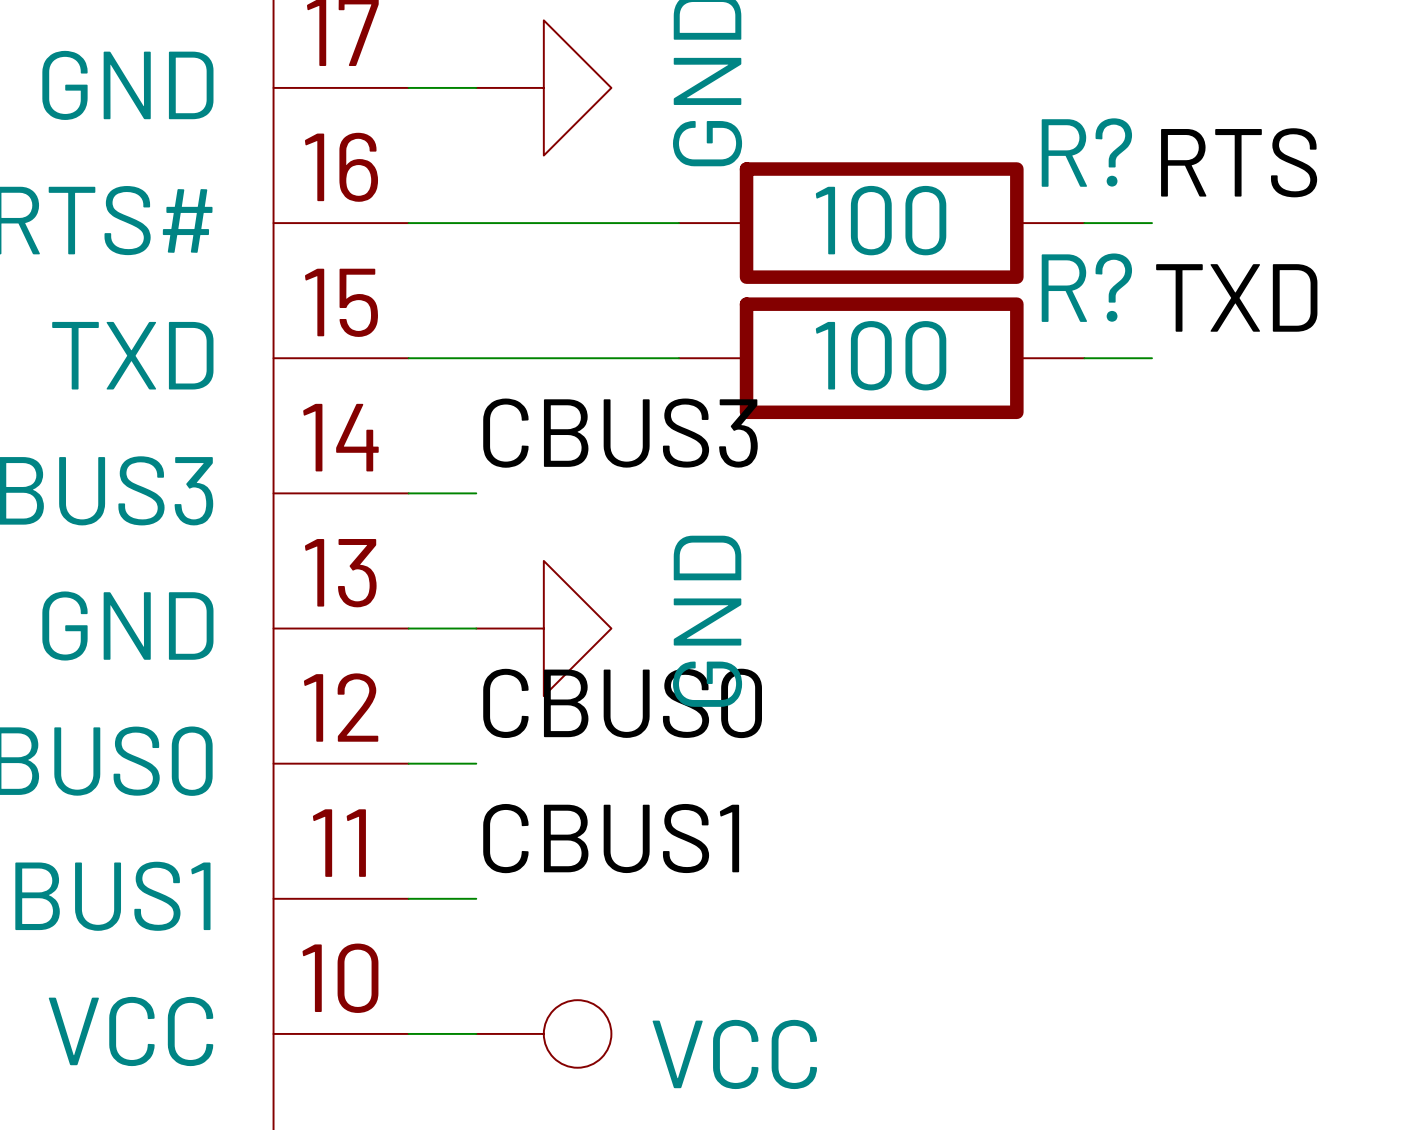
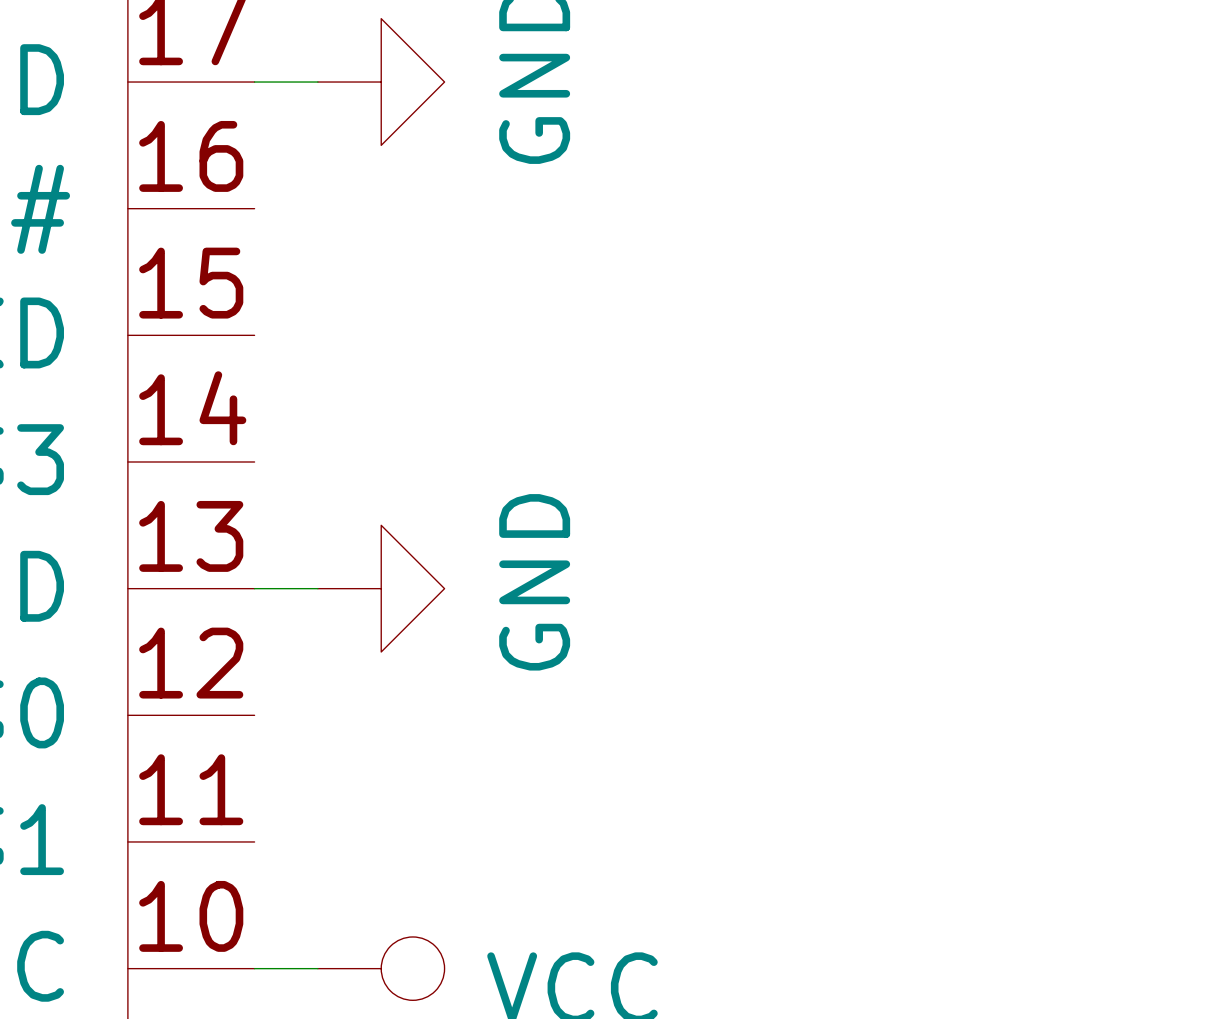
label: RTS (1239, 162) -> none
wire: (408, 223) (678, 223) -> none
R?: 100 (881, 223) -> none
wire: (1084, 223) (1151, 223) -> none
label: TXD (1236, 297) -> none
wire: (408, 358) (678, 358) -> none
R?: 100 (881, 358) -> none
wire: (1084, 358) (1151, 358) -> none
label: CBUS3 (620, 433) -> none
wire: (408, 493) (476, 493) -> none
label: CBUS0 (622, 703) -> none
wire: (408, 763) (476, 763) -> none
label: CBUS1 (611, 838) -> none
wire: (408, 898) (476, 898) -> none

